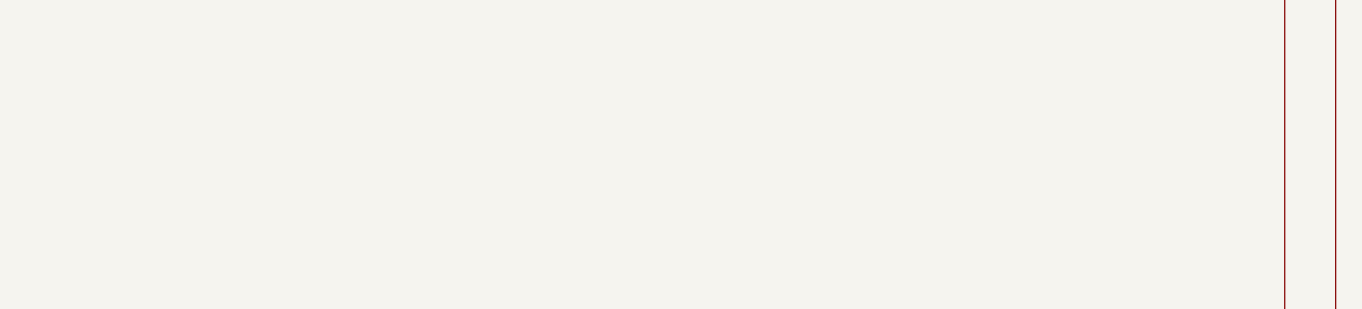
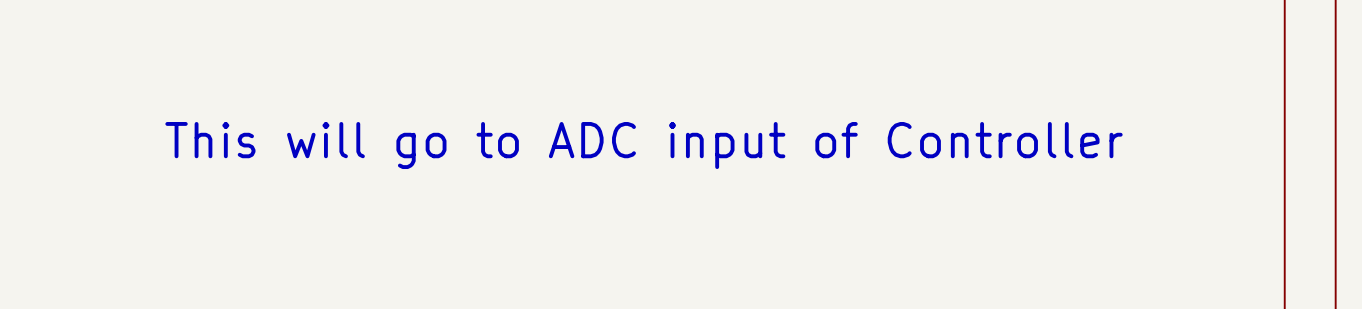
text: none -> This will go to ADC input of Controller (644, 145)

